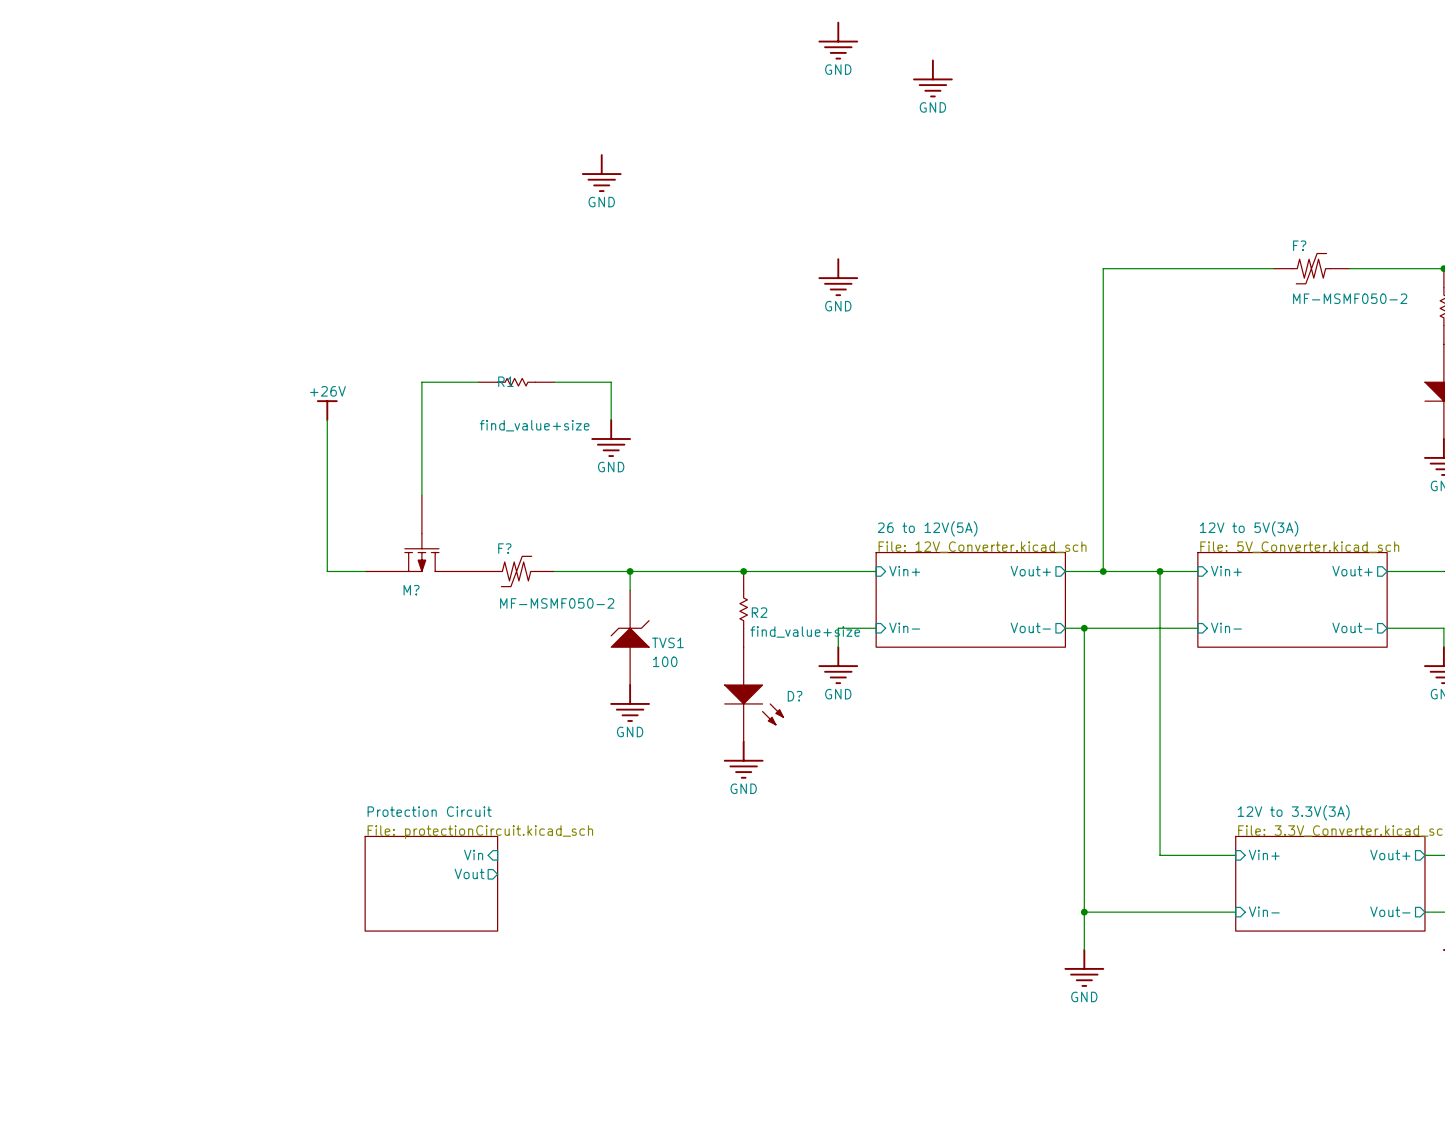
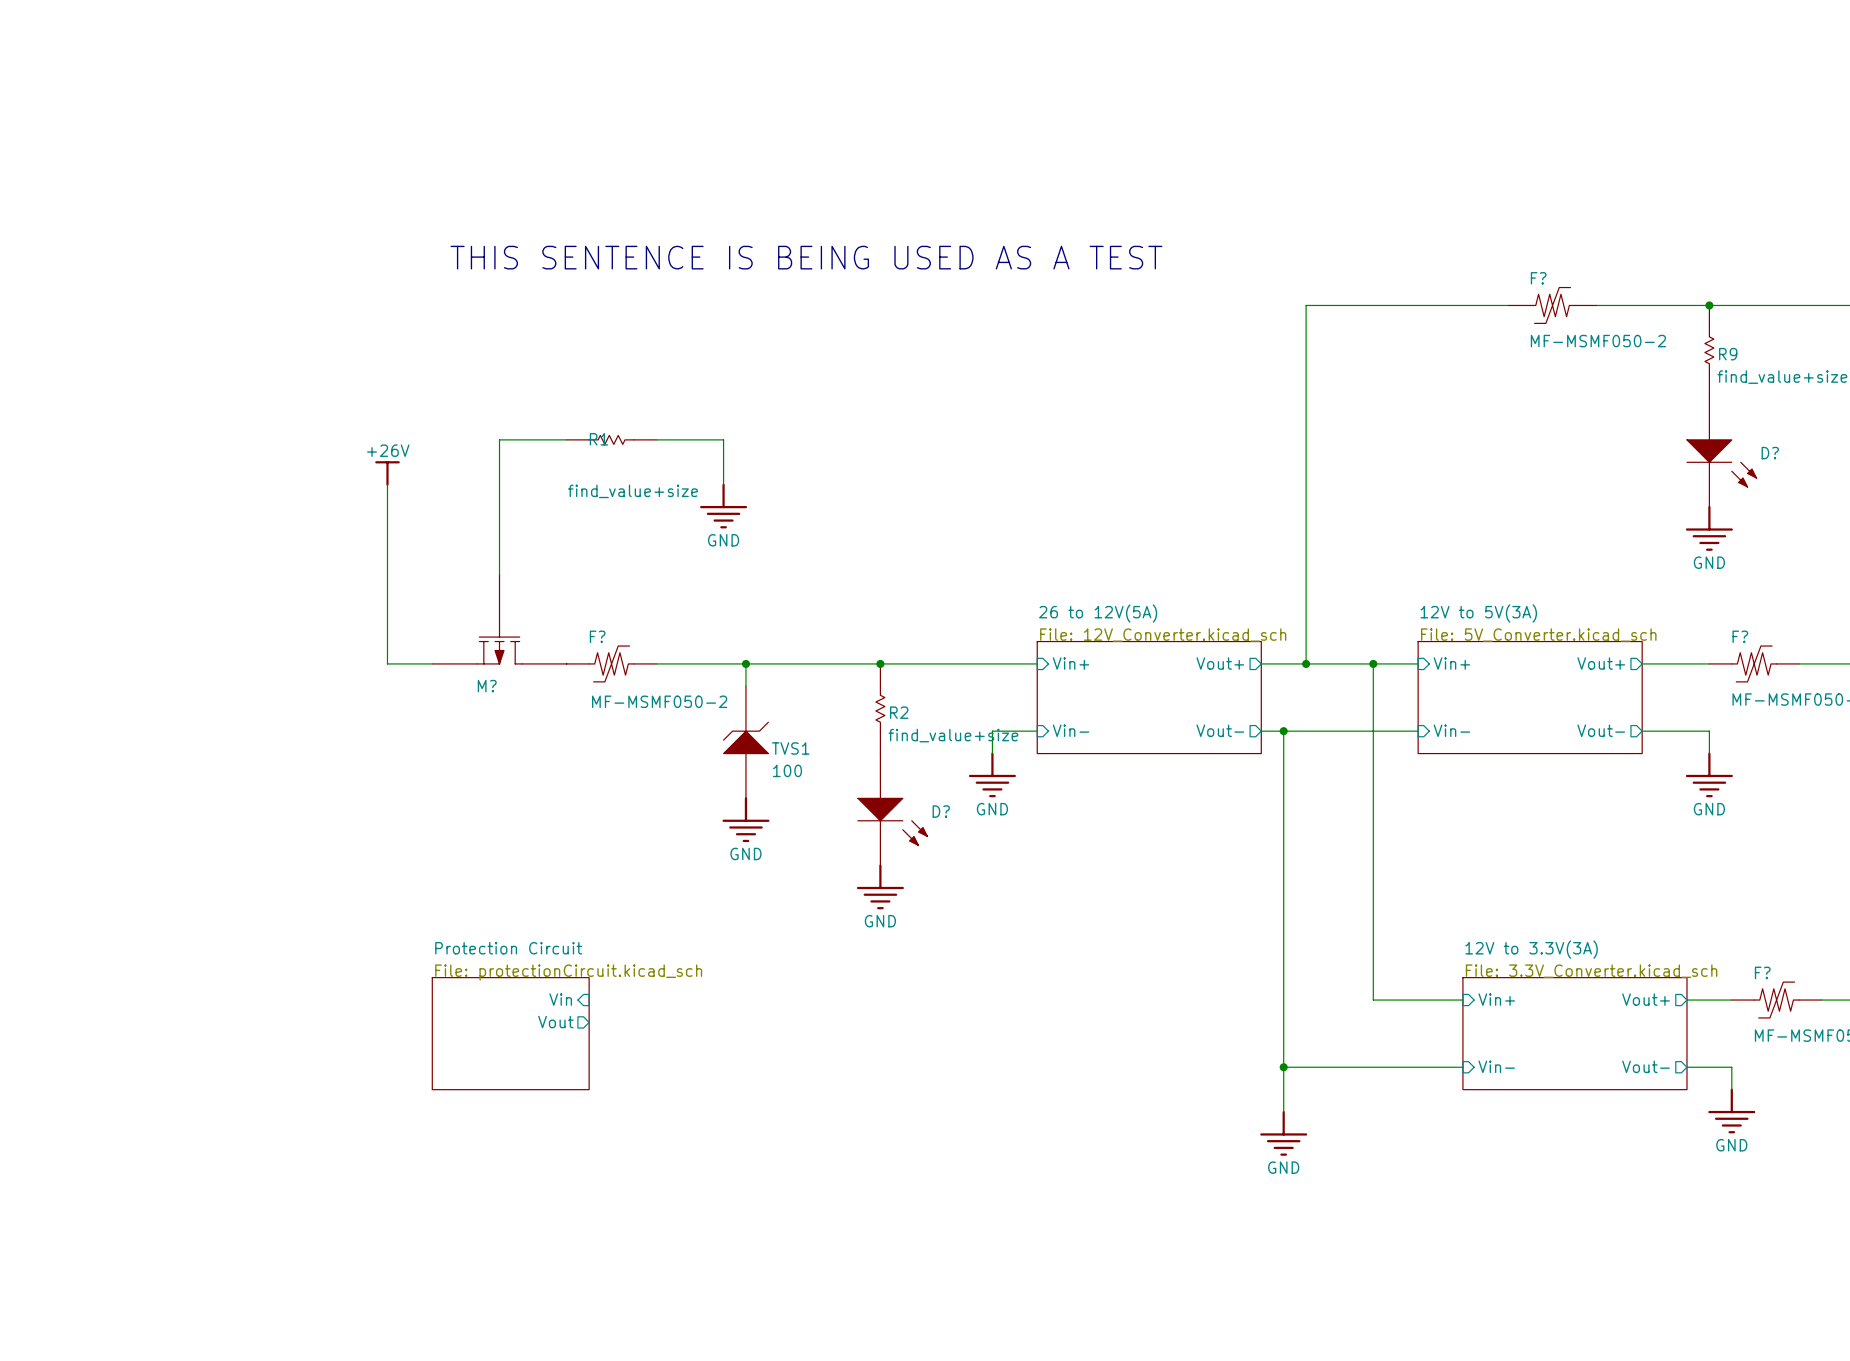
power symbol: GND (838, 40) -> none
power symbol: GND (932, 78) -> none
power symbol: GND (601, 173) -> none
text: none -> THIS SENTENCE IS BEING USED AS A TEST (806, 257)
power symbol: GND (838, 277) -> none

